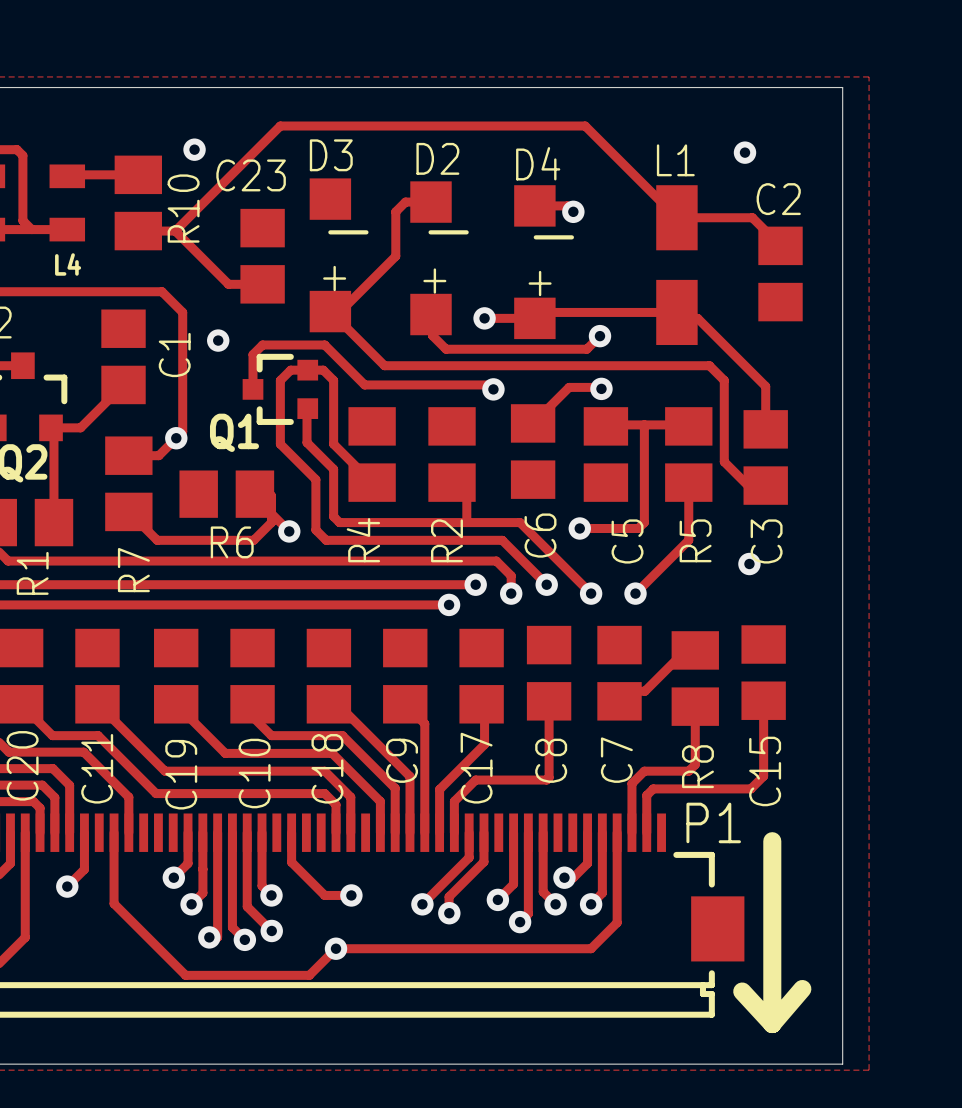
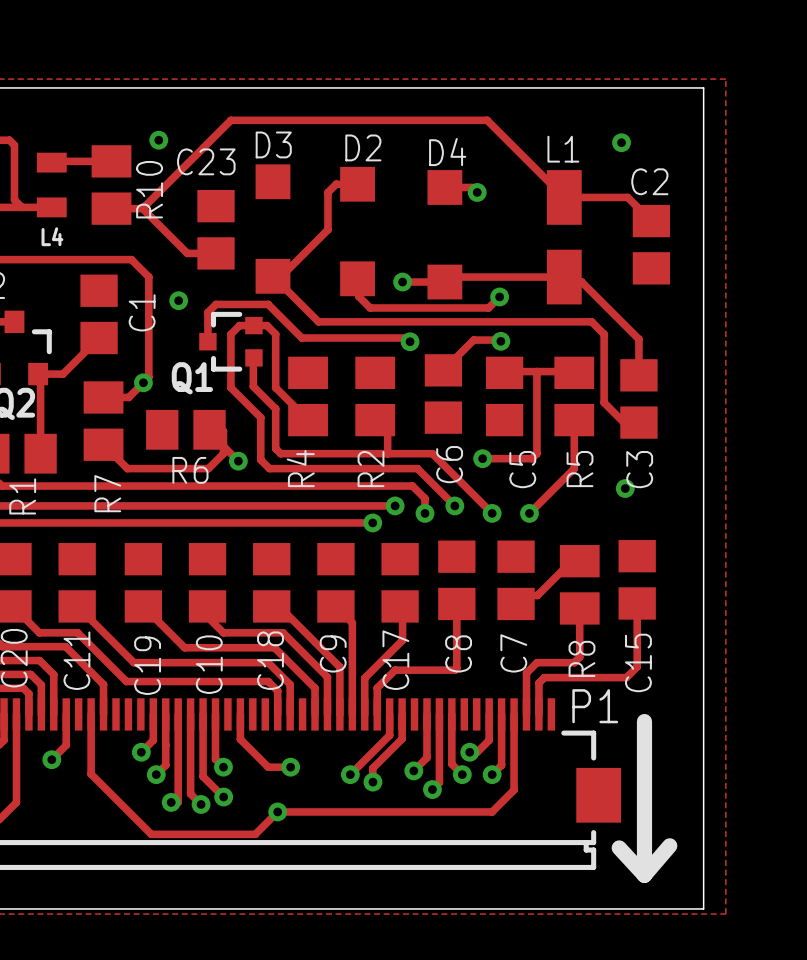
text: - (348, 232) -> none
text: - (448, 232) -> none
text: - (553, 237) -> none
text: + (334, 278) -> none
text: + (434, 281) -> none
text: + (540, 283) -> none

